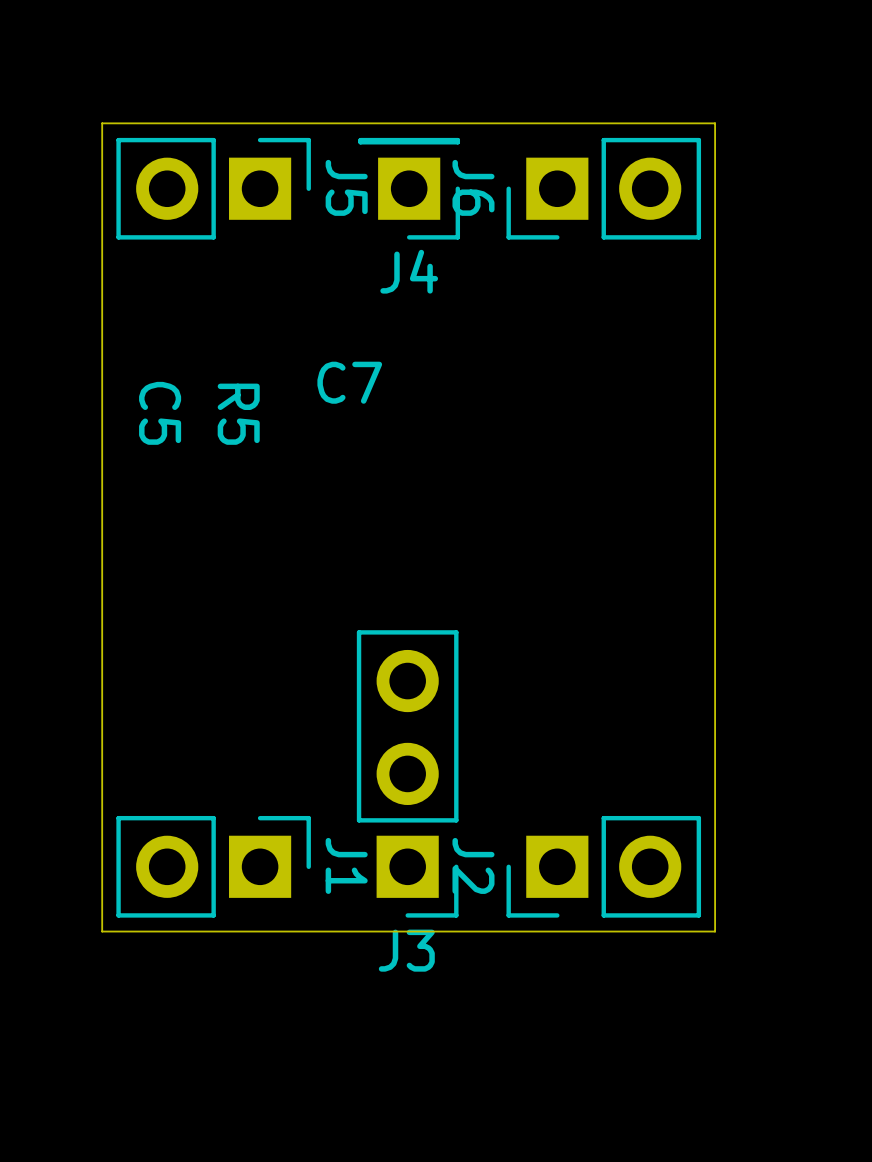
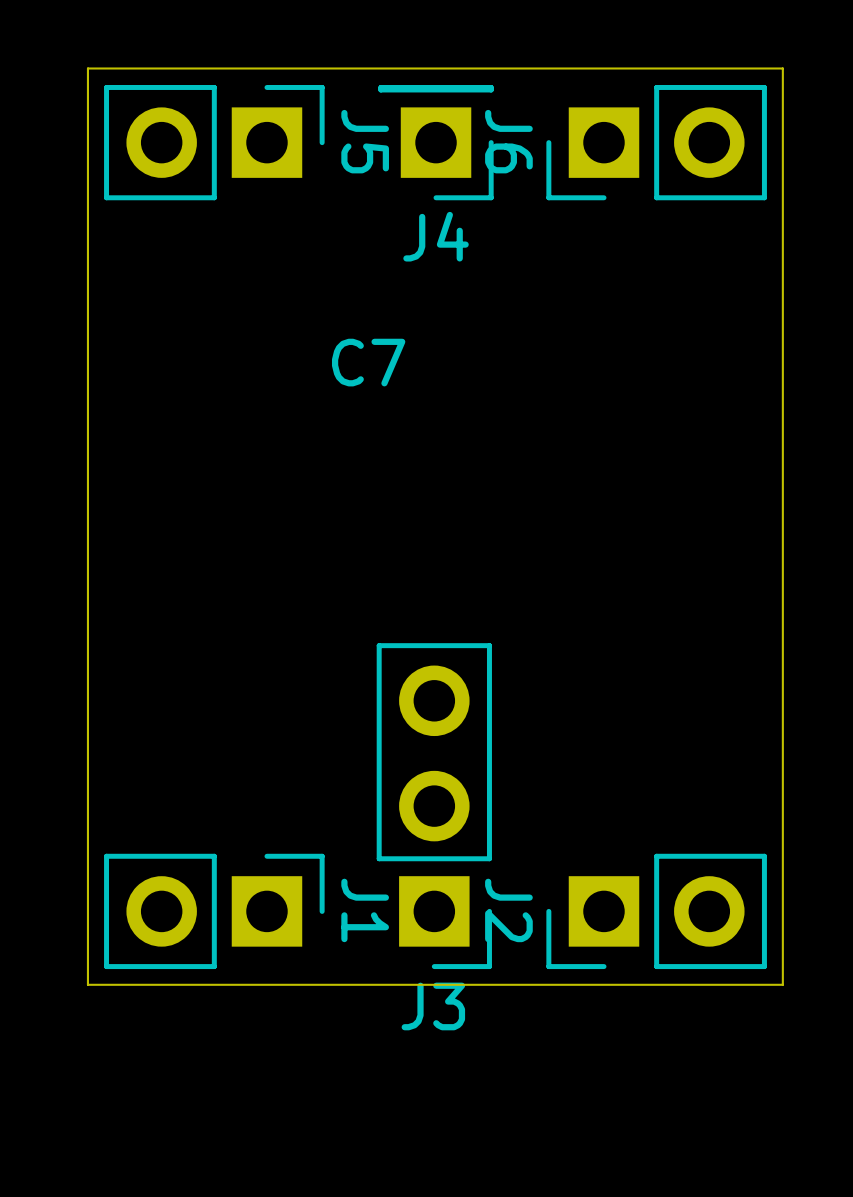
C5: (160, 413) -> none
R5: (238, 414) -> none

